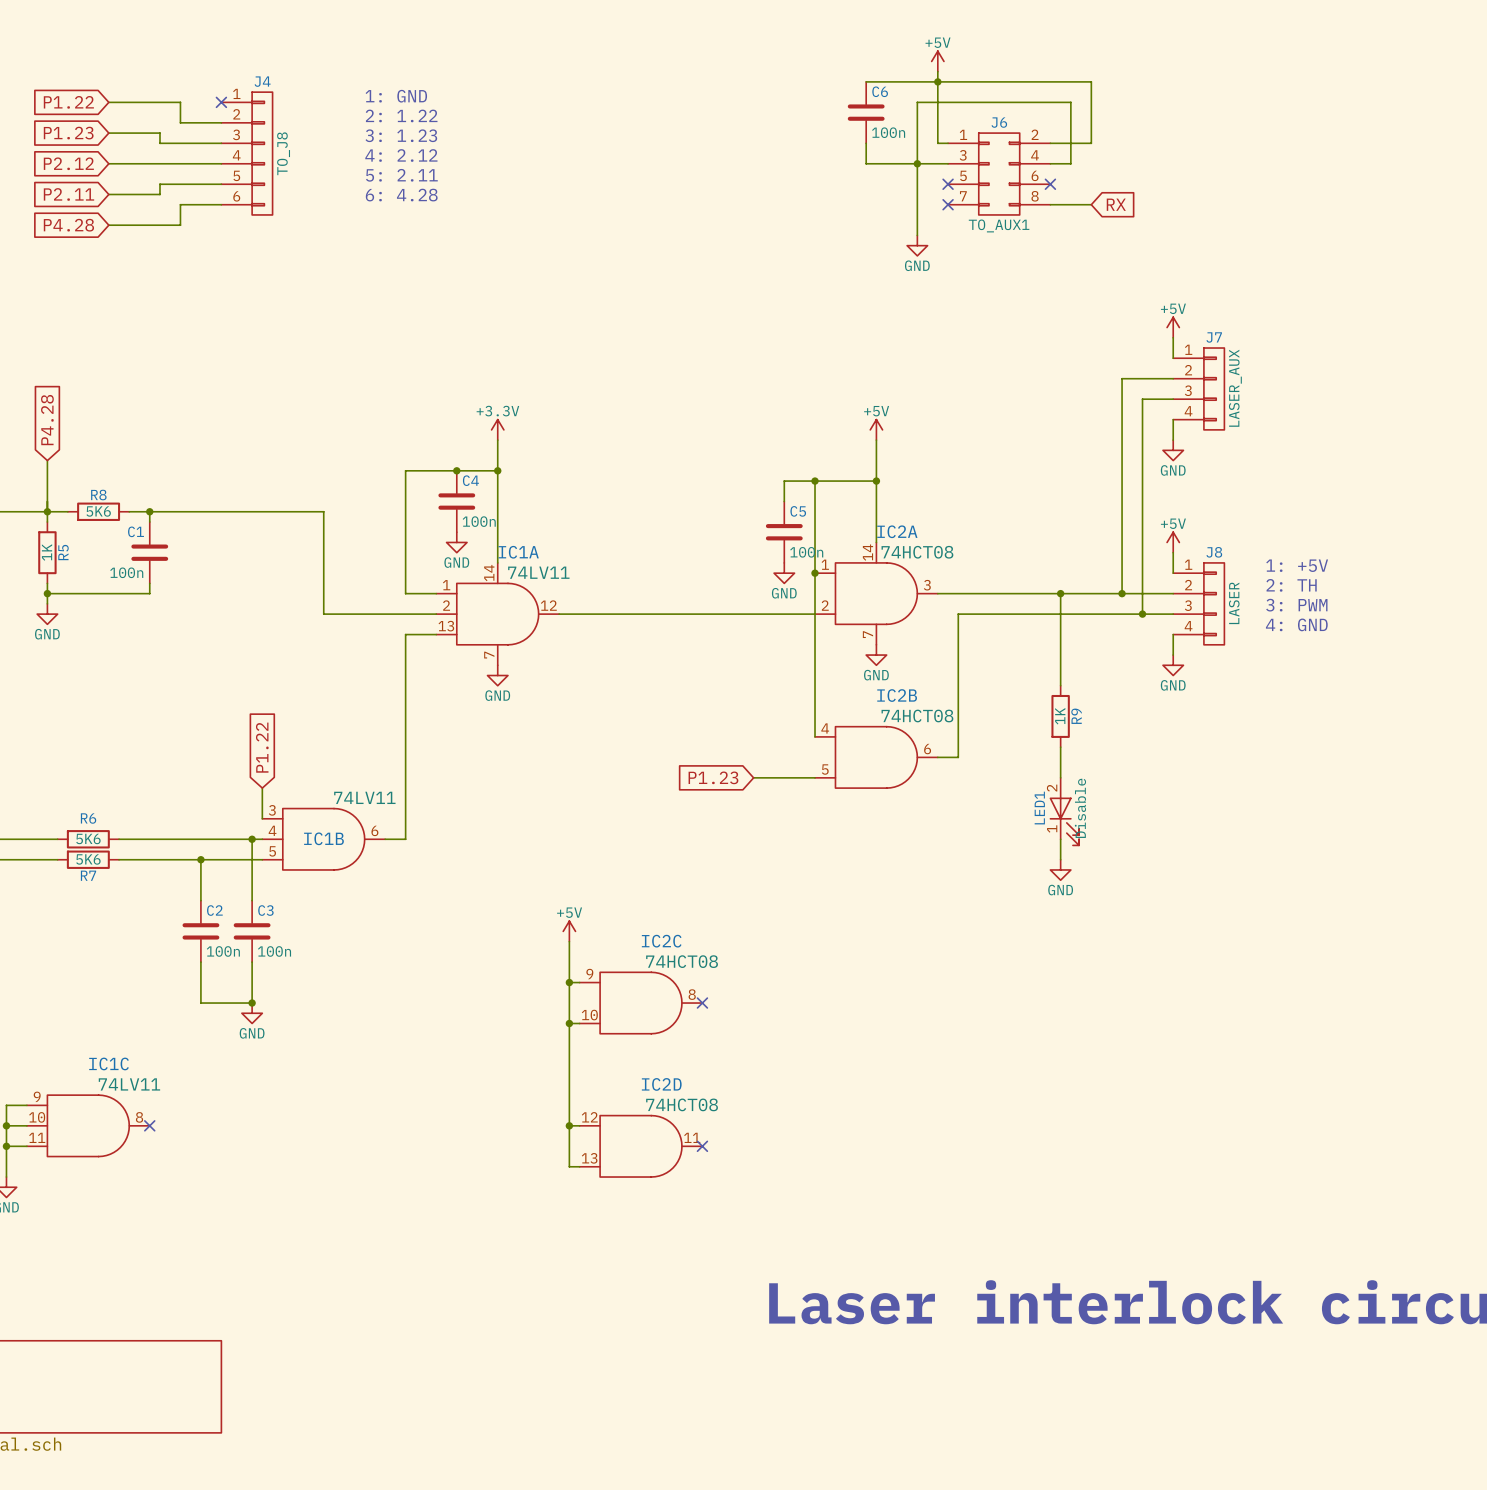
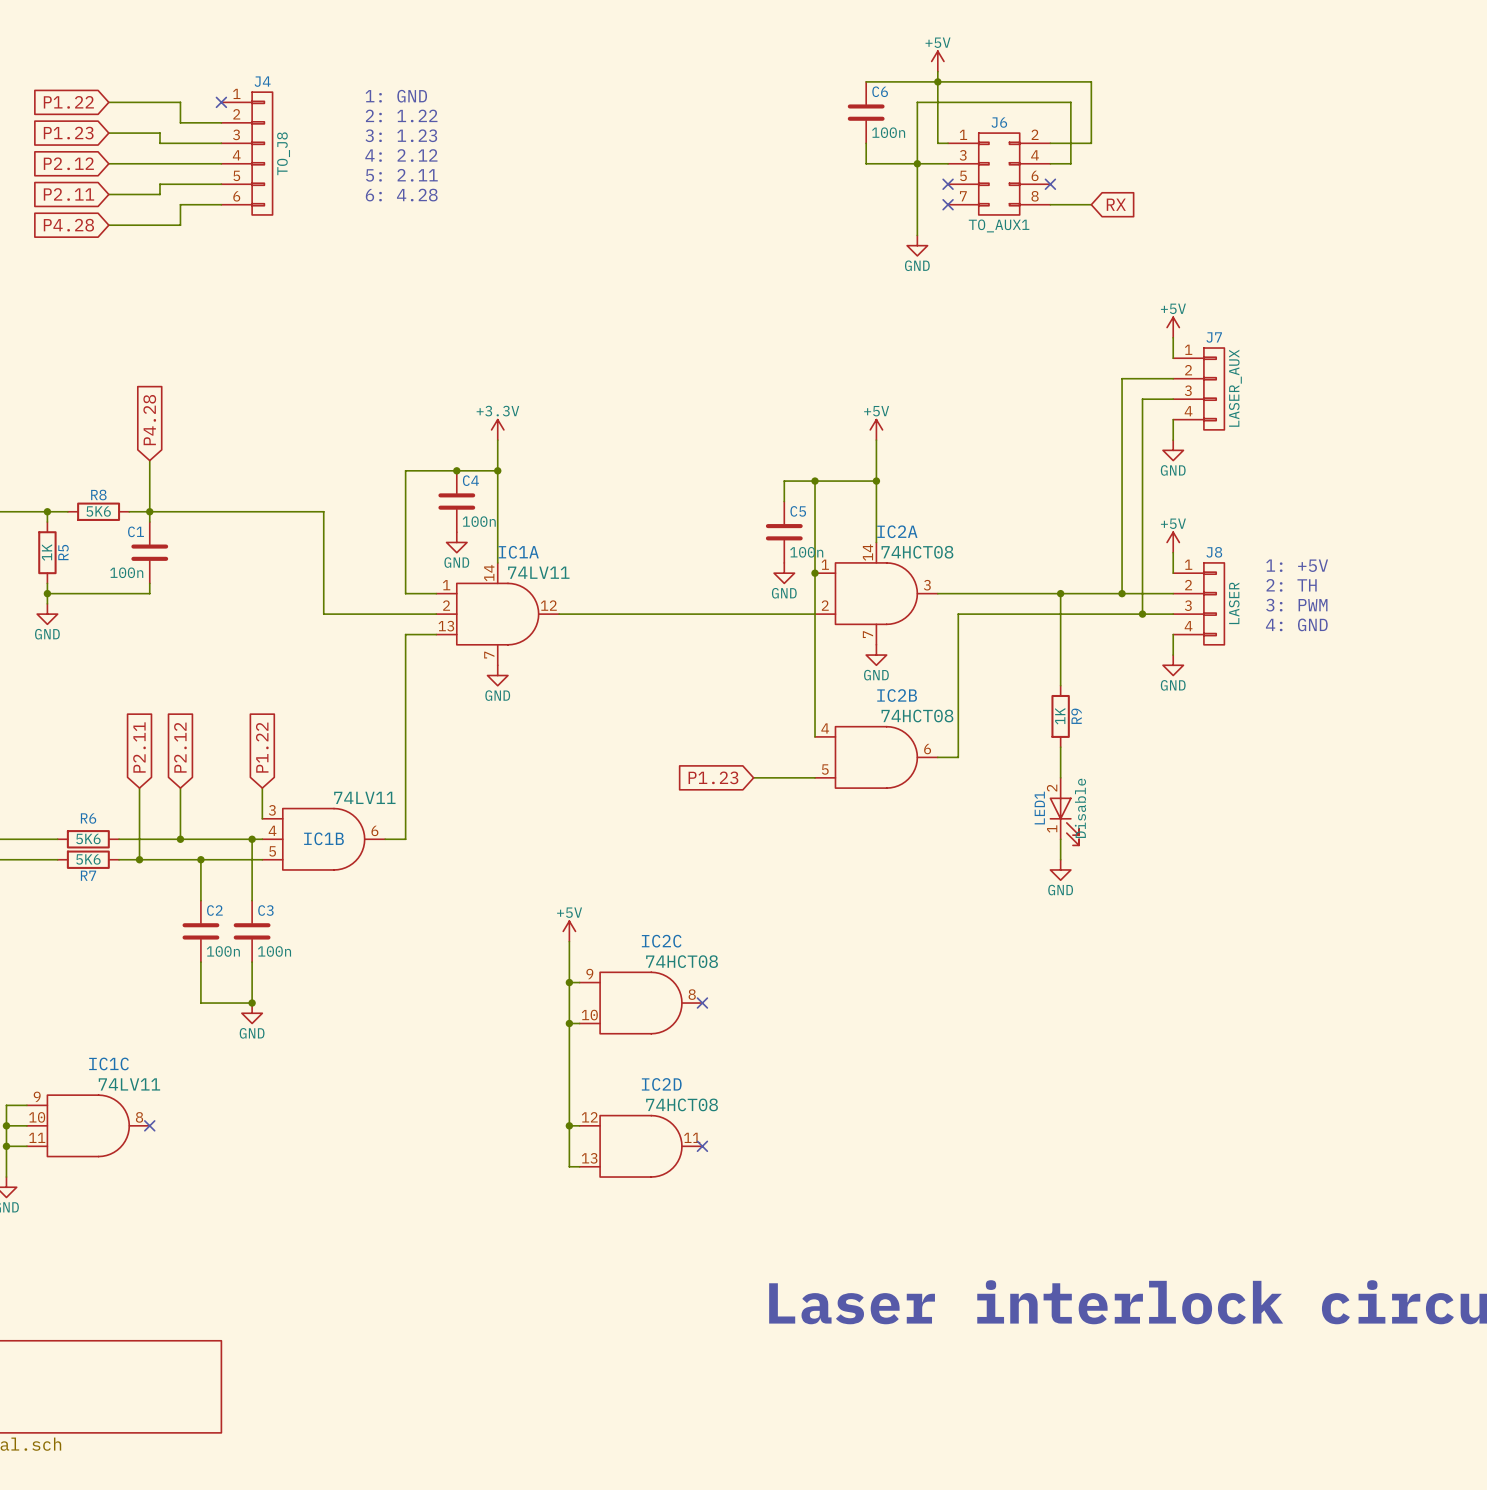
global label position: P4.28 (47, 420) -> P4.28 (149, 420)
wire: (47, 460) (47, 511) -> (149, 460) (149, 511)
global label: none -> P2.11 (139, 747)
global label: none -> P2.12 (180, 747)
wire: none -> (139, 788) (139, 859)
wire: none -> (180, 788) (180, 839)
junction: none -> (180, 839)
junction: none -> (139, 859)

